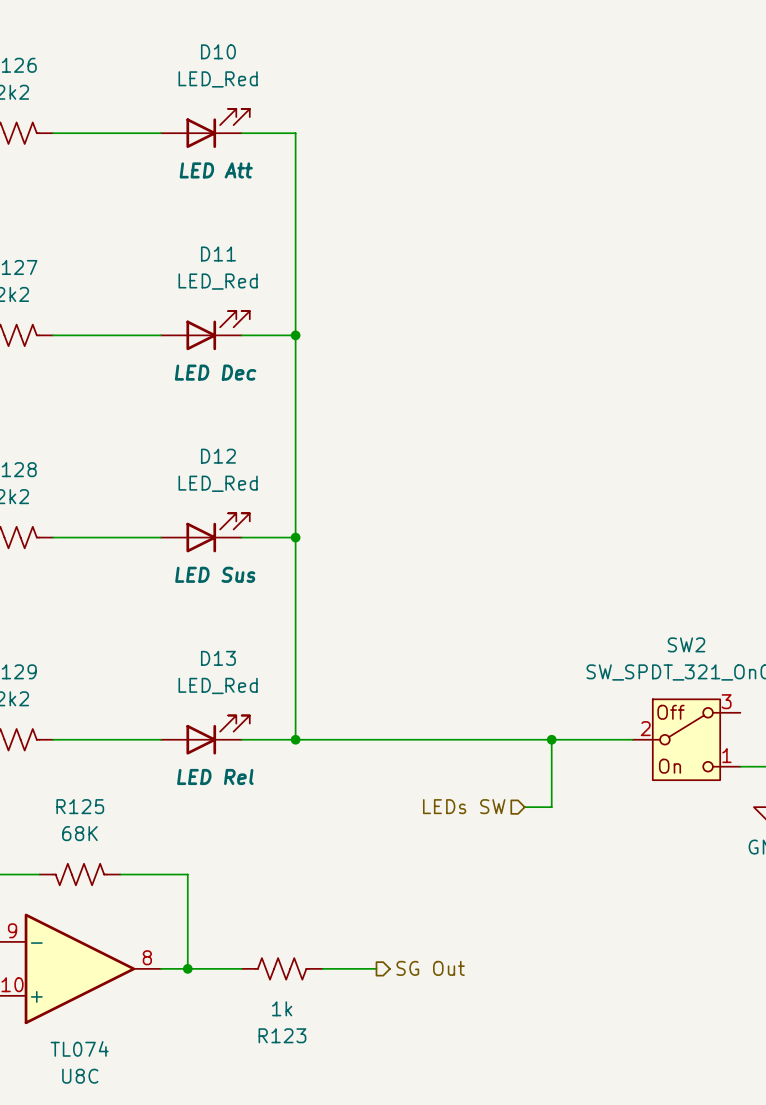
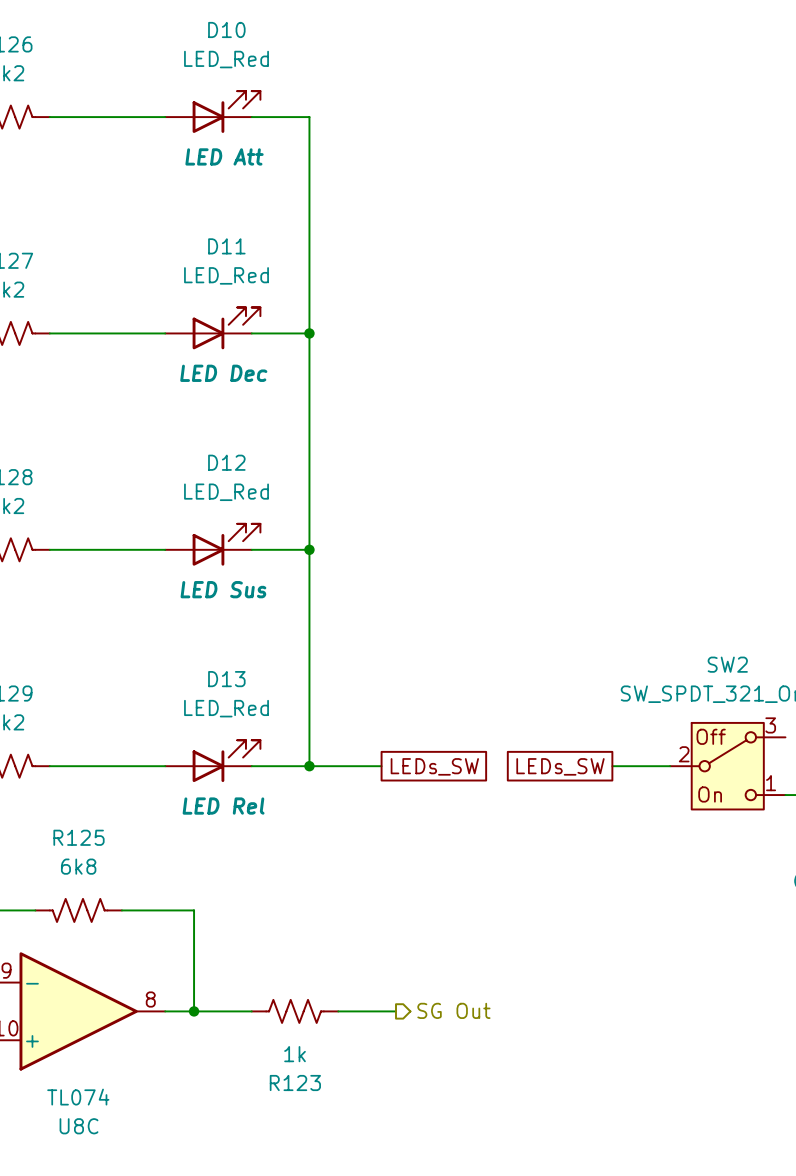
wire: (363, 739) (578, 739) -> none
wire: (551, 739) (551, 807) (524, 807) -> none
junction: (551, 739) -> none
global label: none -> LEDs_SW (434, 766)
global label: none -> LEDs_SW (560, 766)
hierarchical label: LEDs SW (464, 806) -> none
R125 value: 68K (79, 833) -> 6k8 (78, 866)

